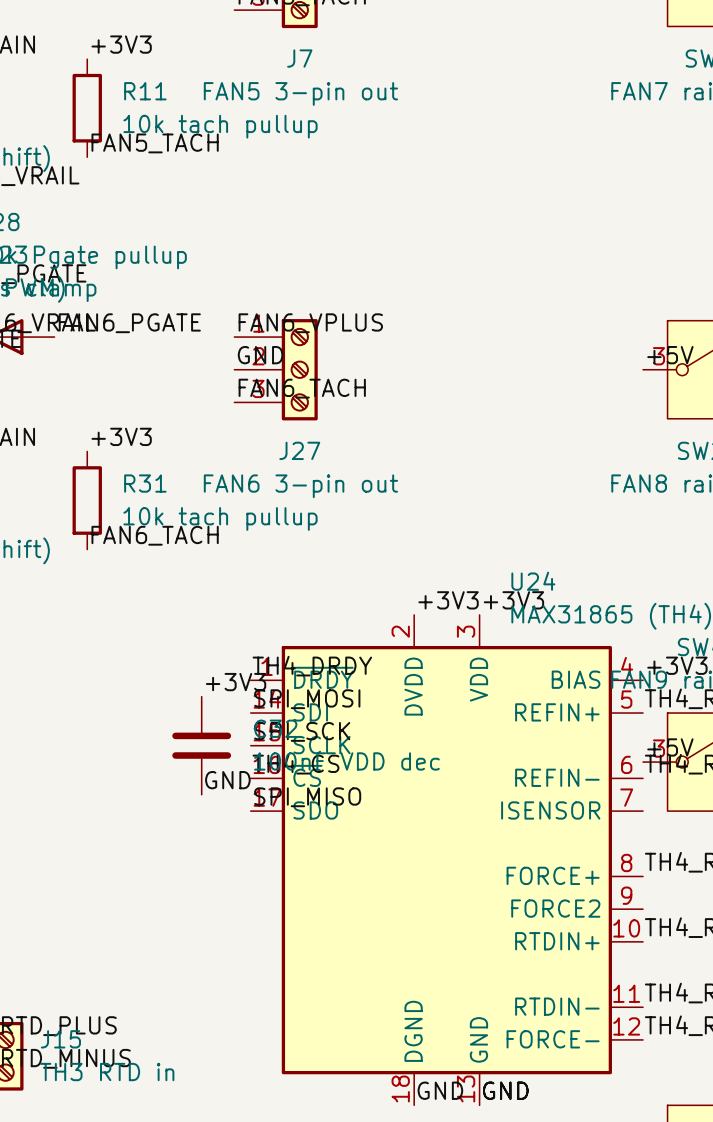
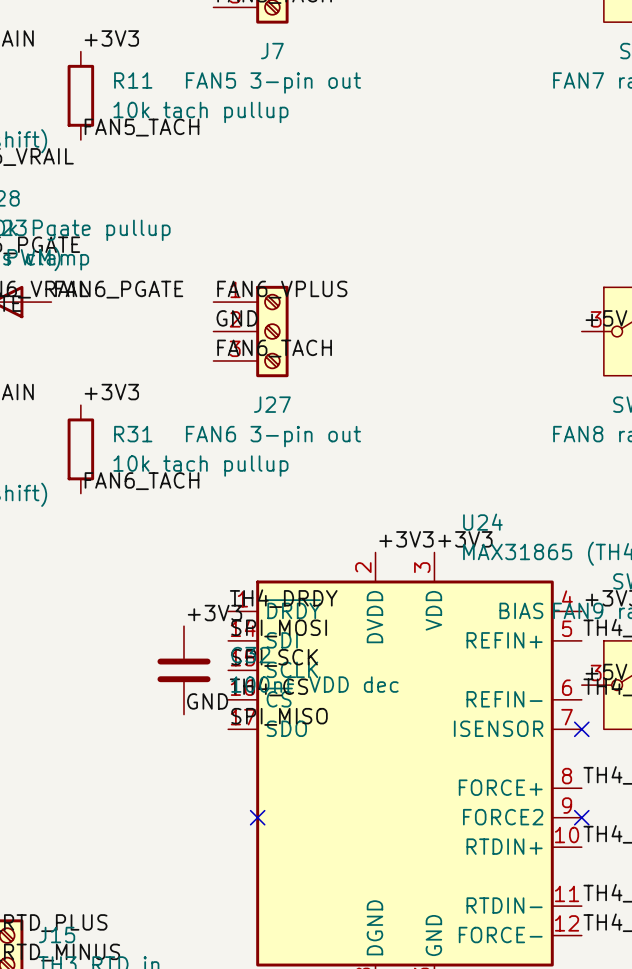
no-connect mark: none -> (581, 729)
no-connect mark: none -> (257, 817)
no-connect mark: none -> (581, 817)

